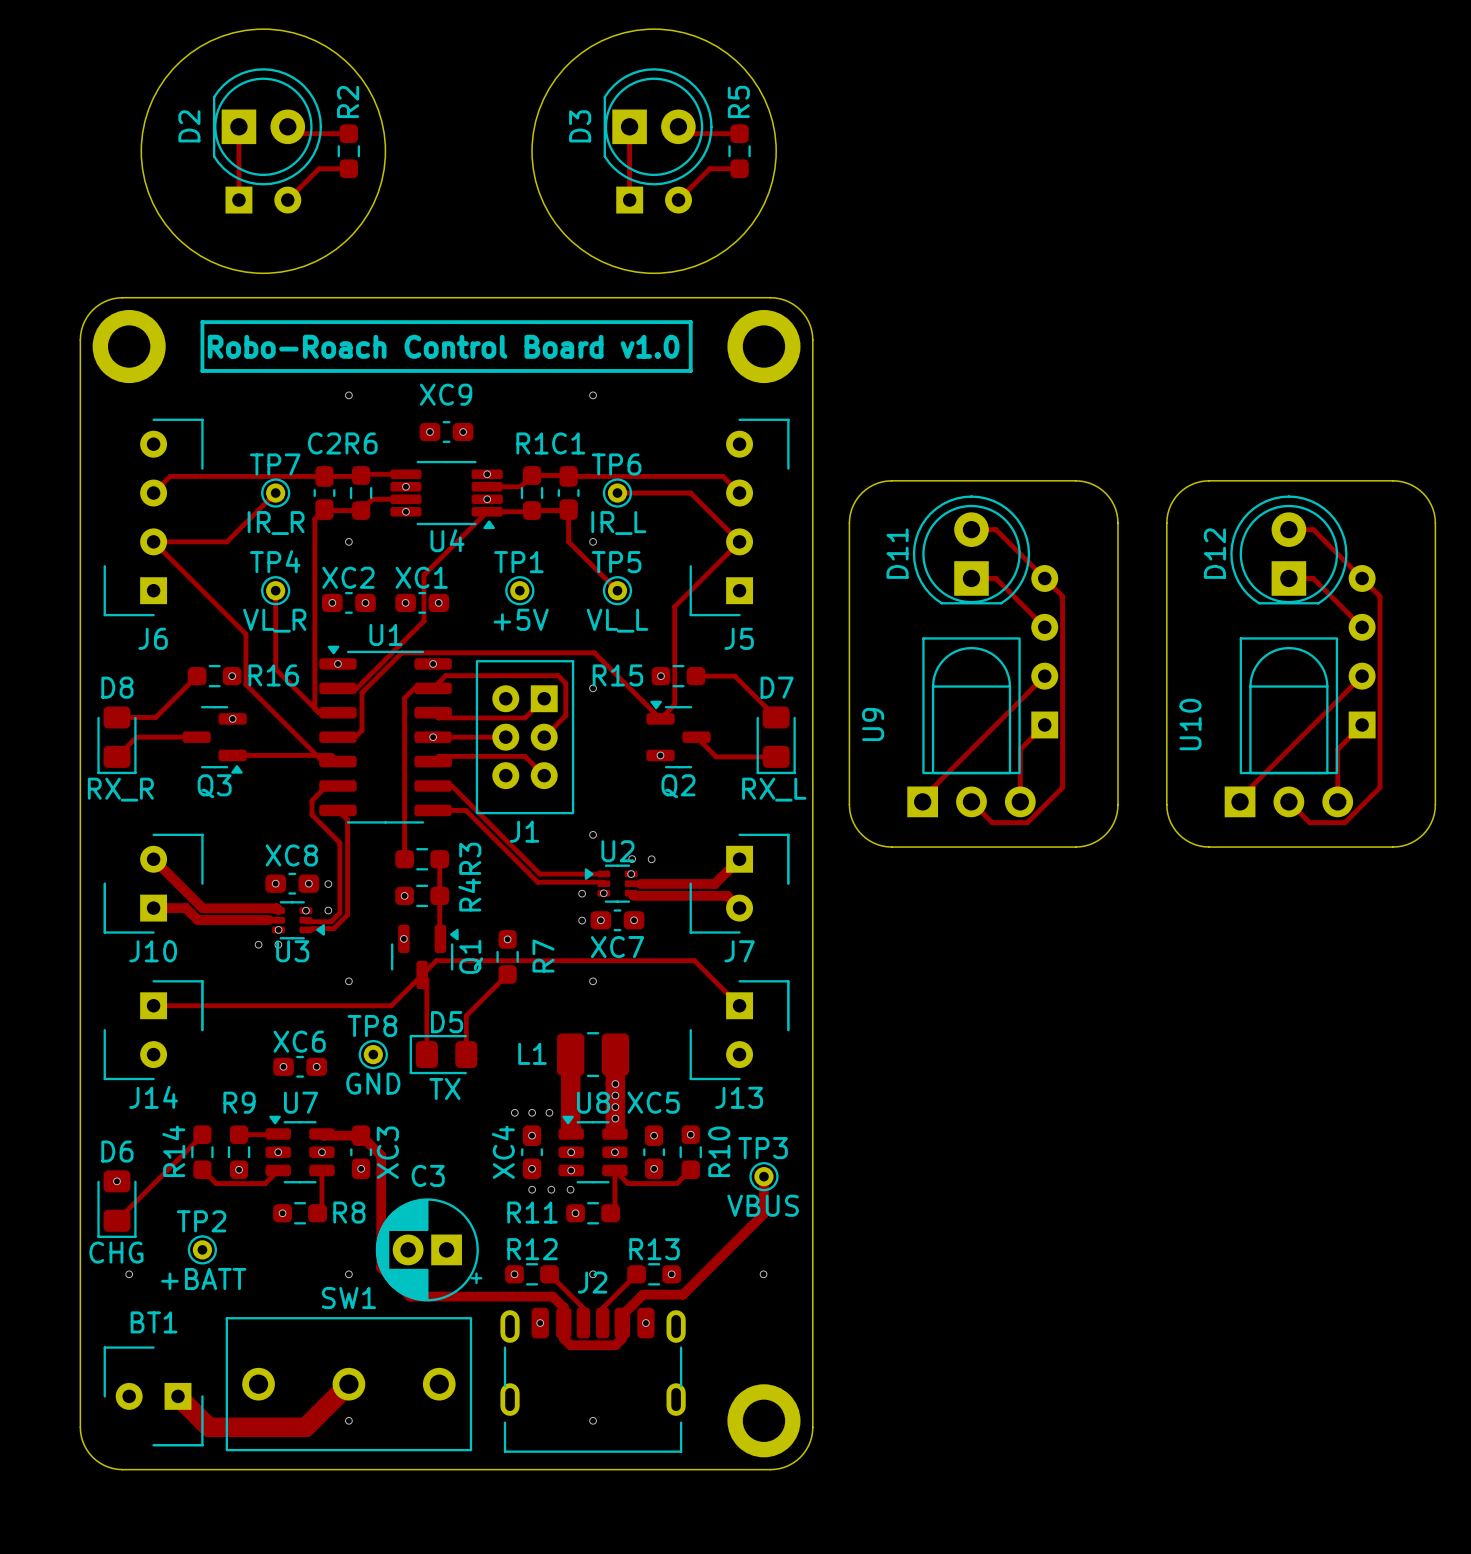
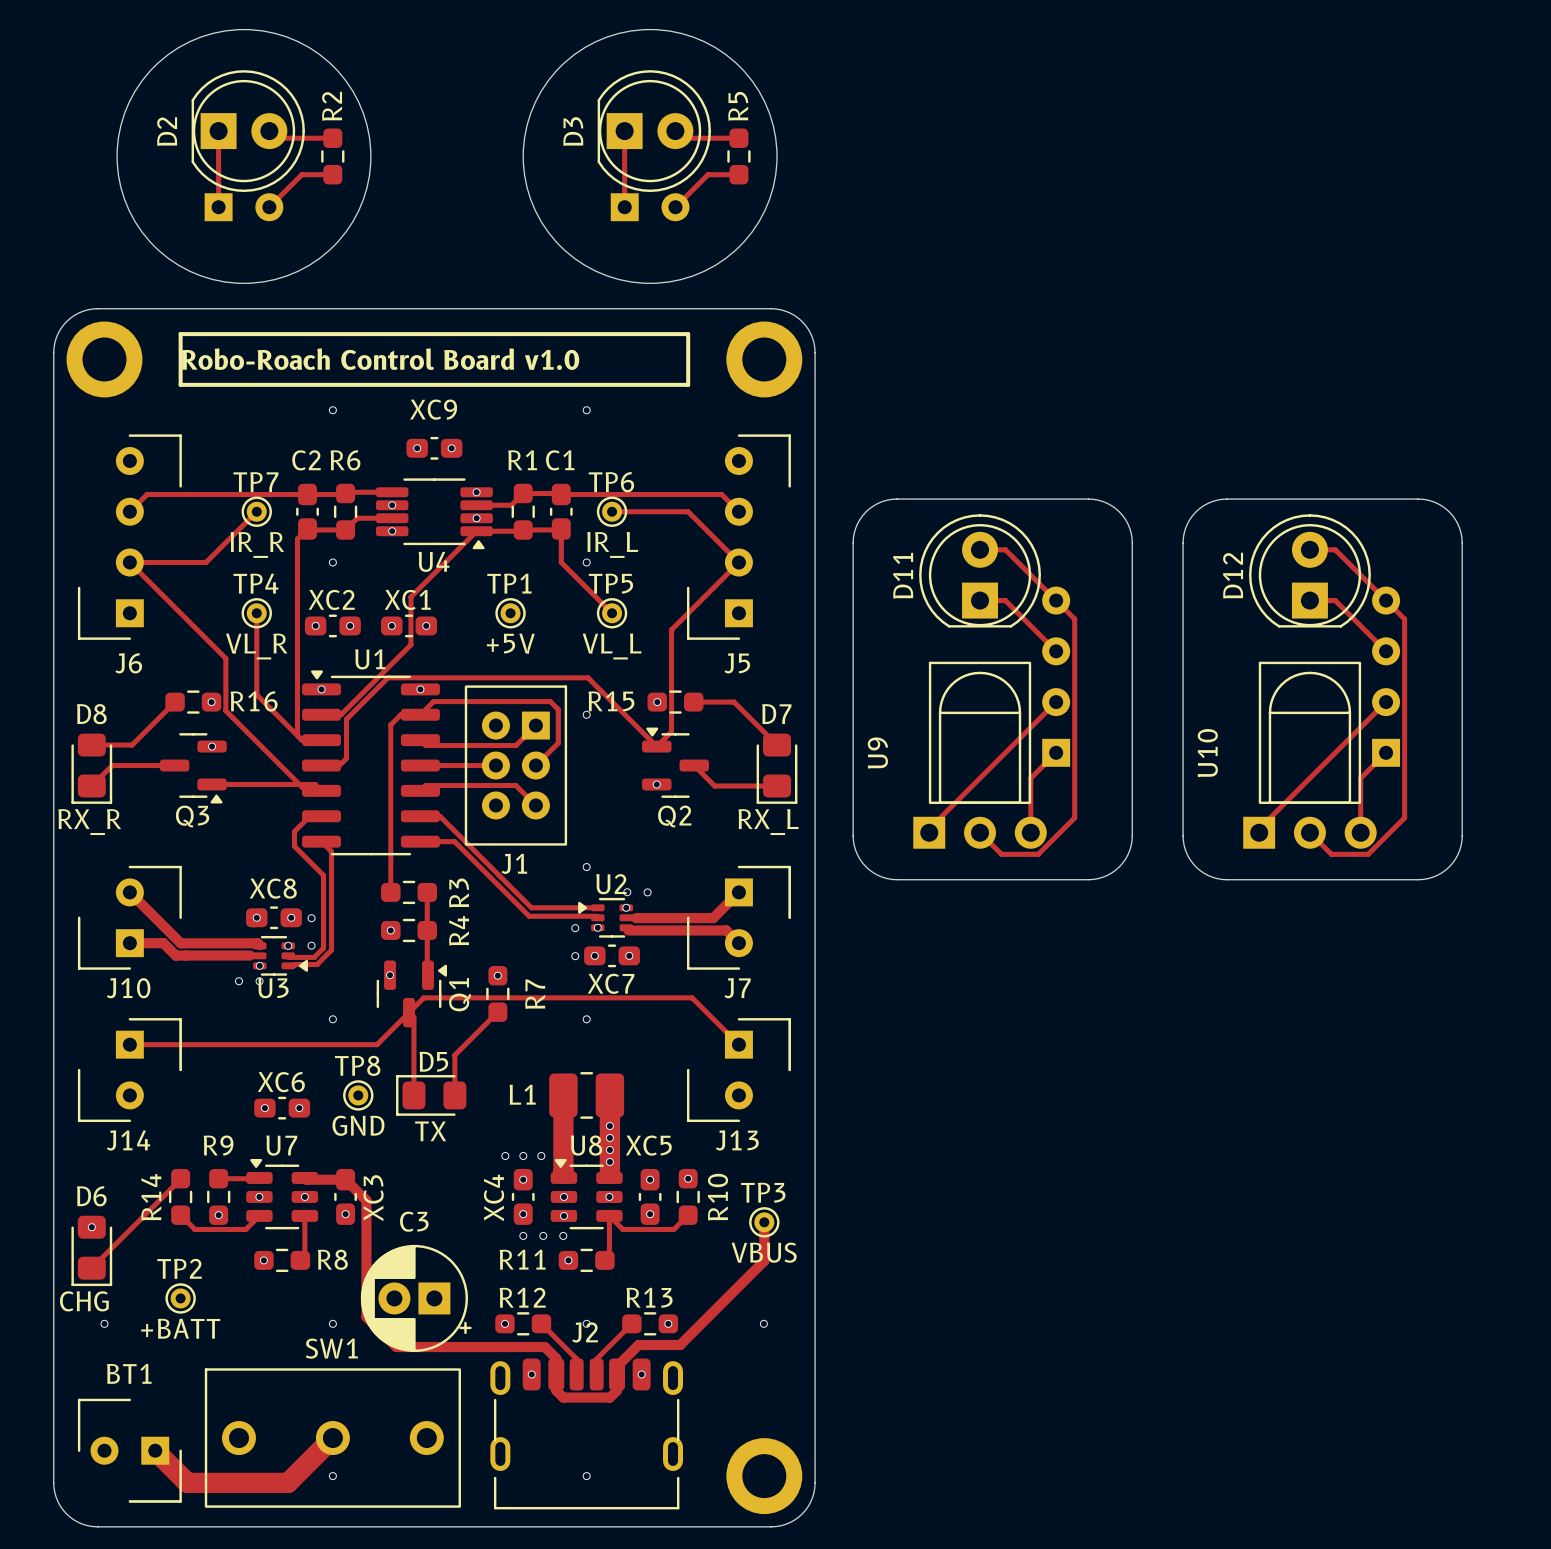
via: (433, 737) -> none

